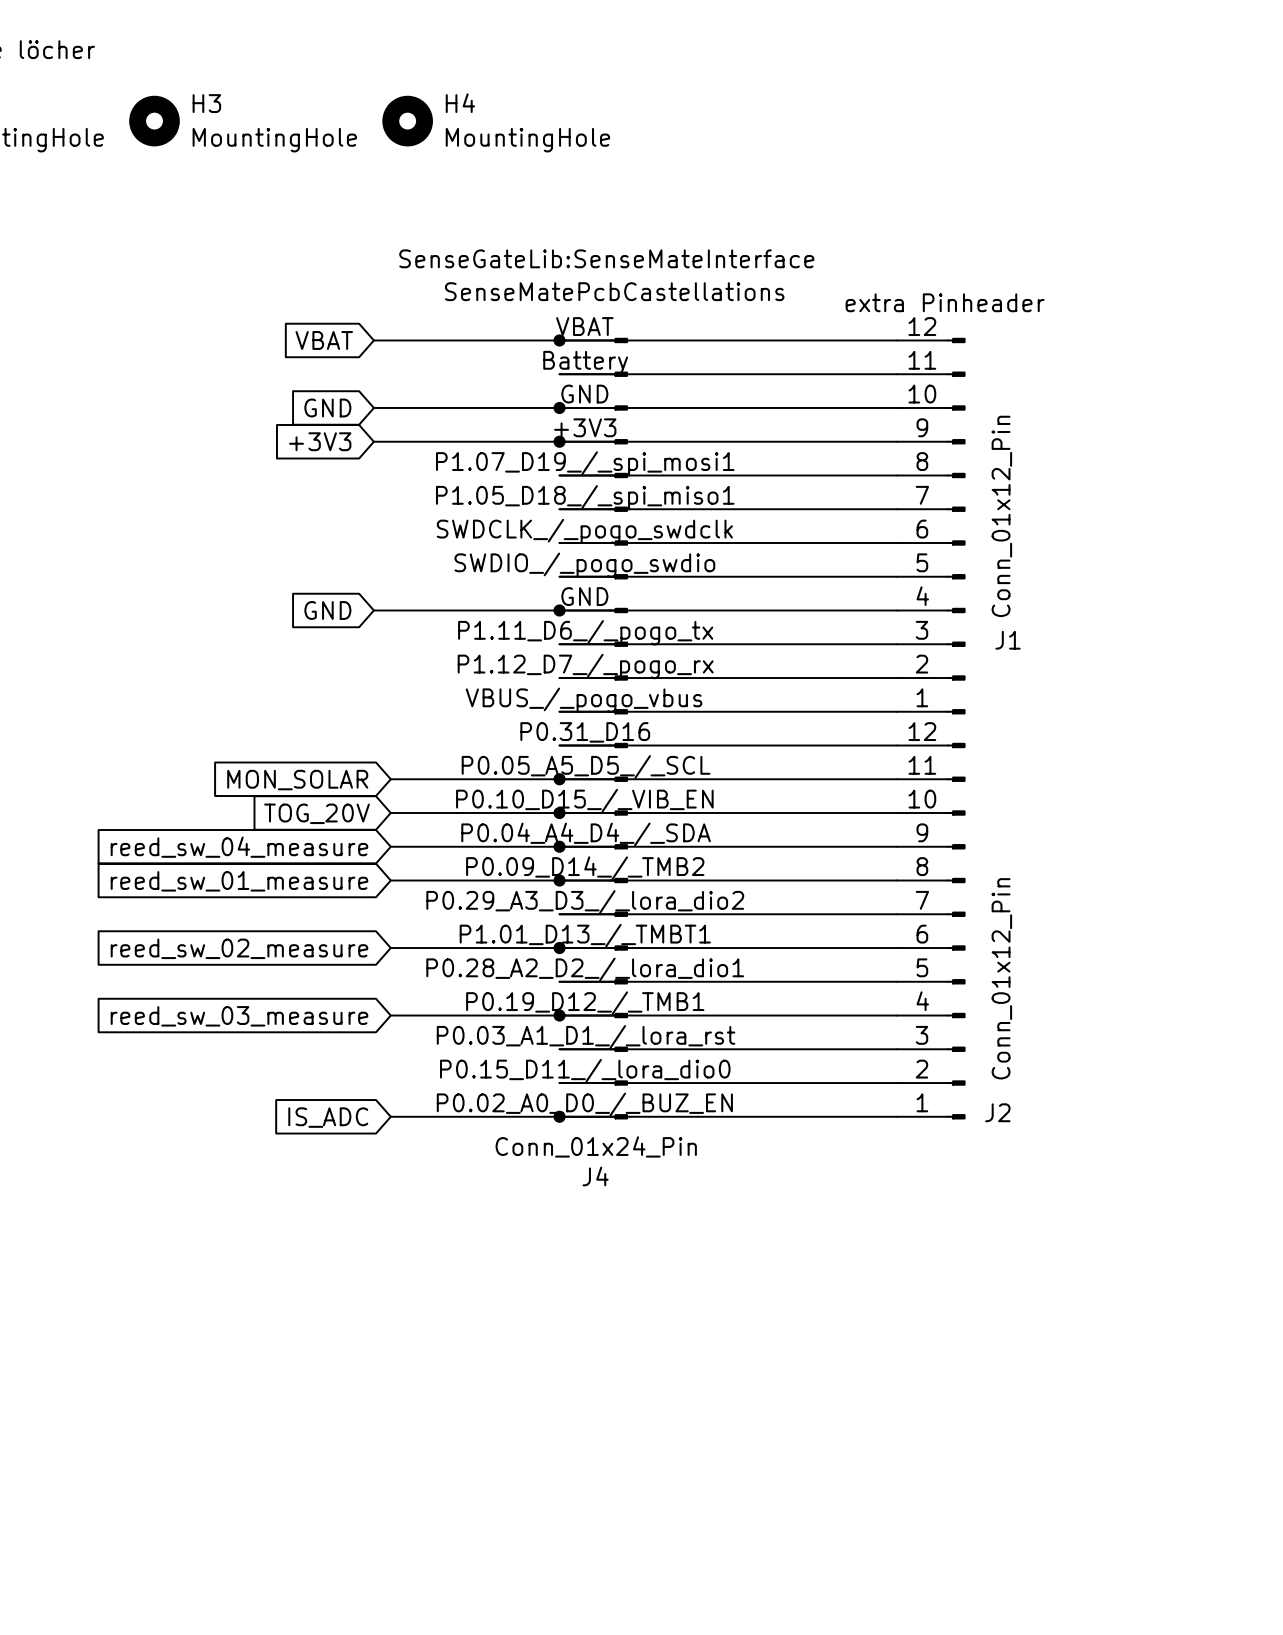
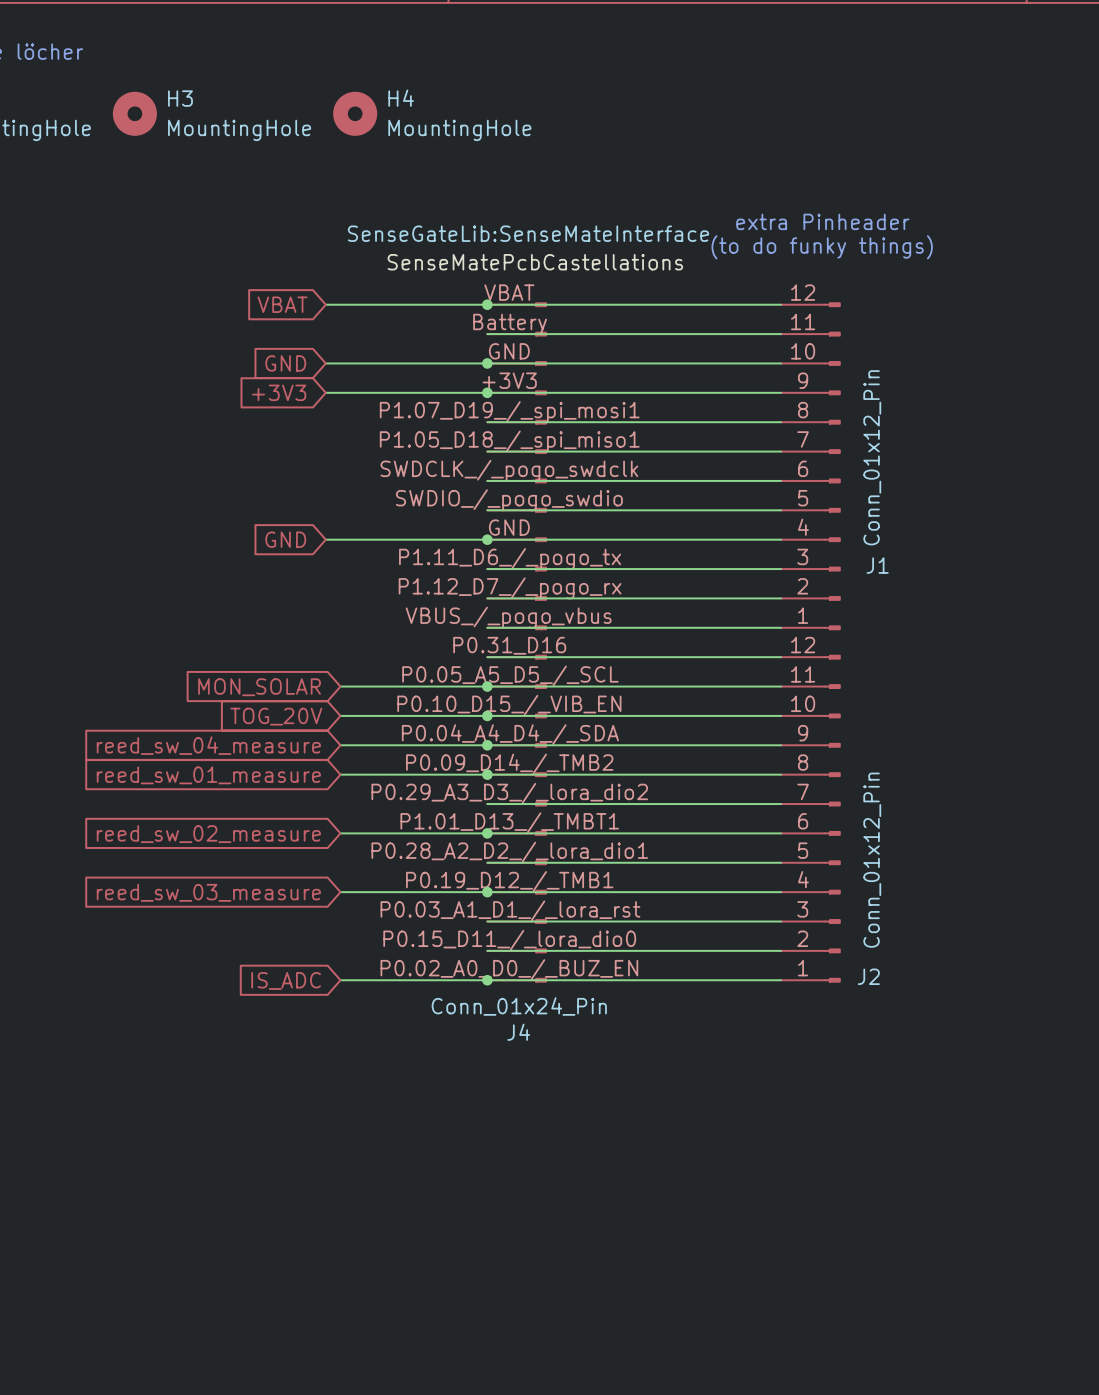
text: none -> (to do funky things) (822, 247)
text position: extra Pinheader (945, 302) -> extra Pinheader (822, 221)

